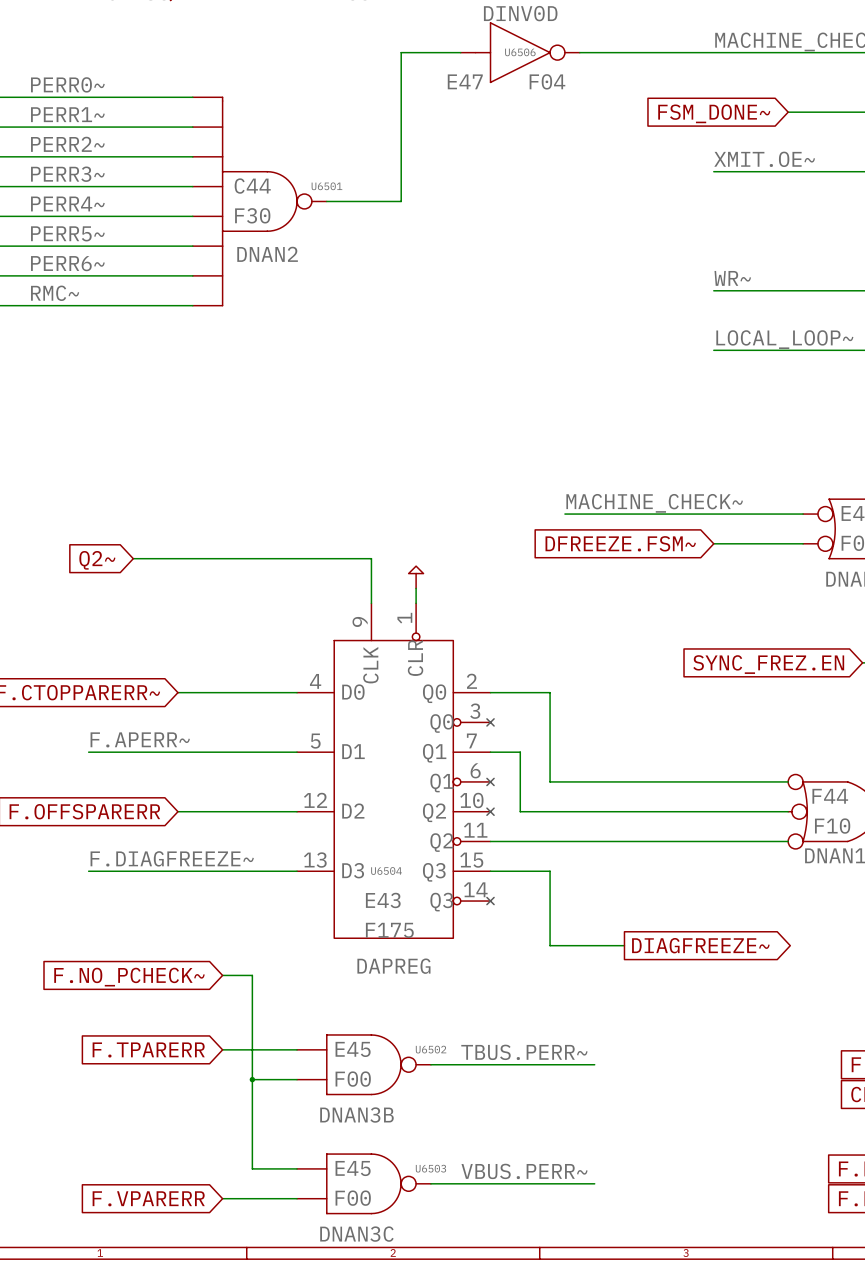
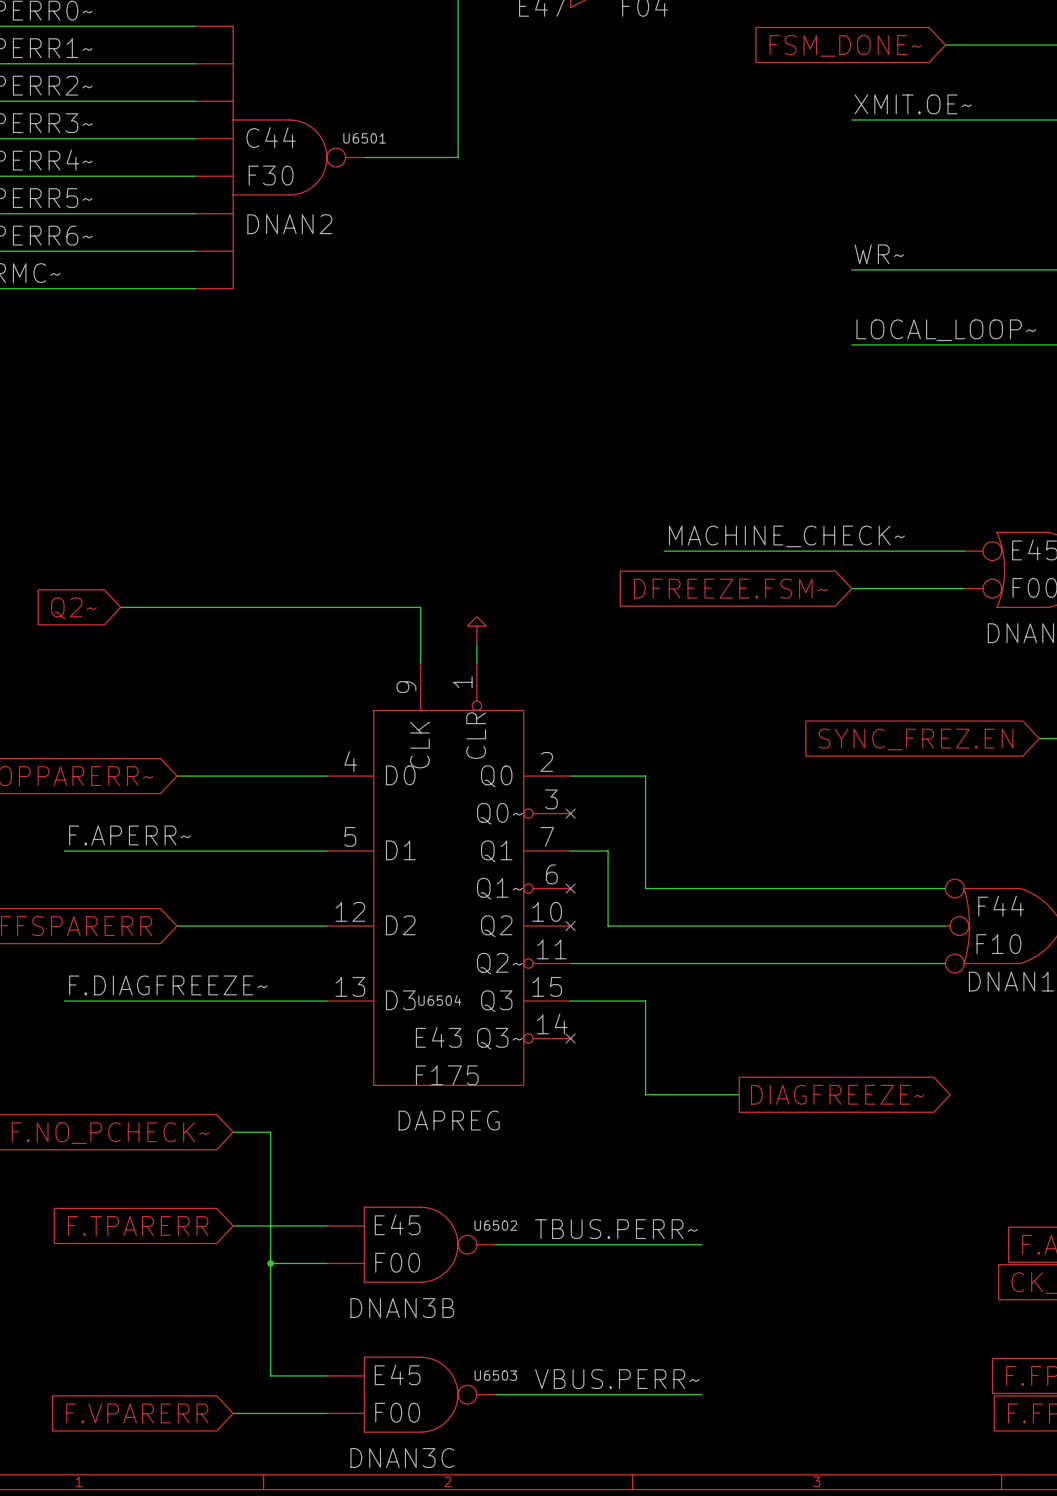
U6504 pin name: Q0 (441, 723) -> Q0~ (499, 813)
U6504 pin name: Q1 (442, 783) -> Q1~ (499, 888)
U6504 pin name: Q2 (441, 842) -> Q2~ (499, 963)
U6504 pin name: Q3 (441, 902) -> Q3~ (499, 1038)

